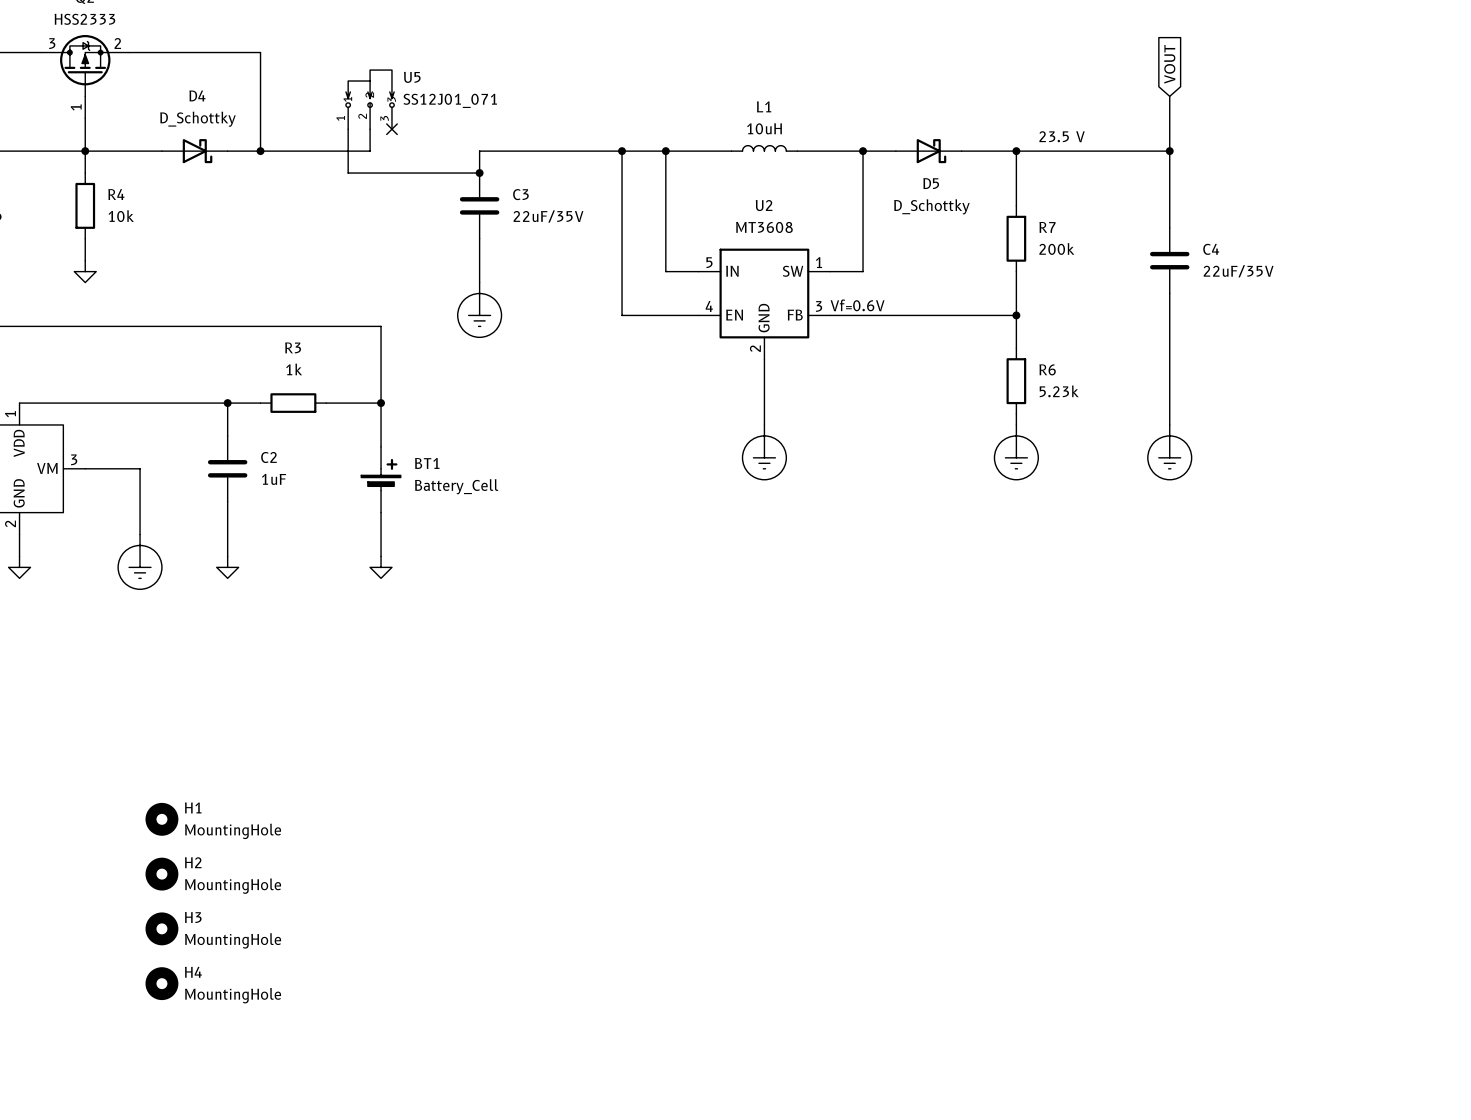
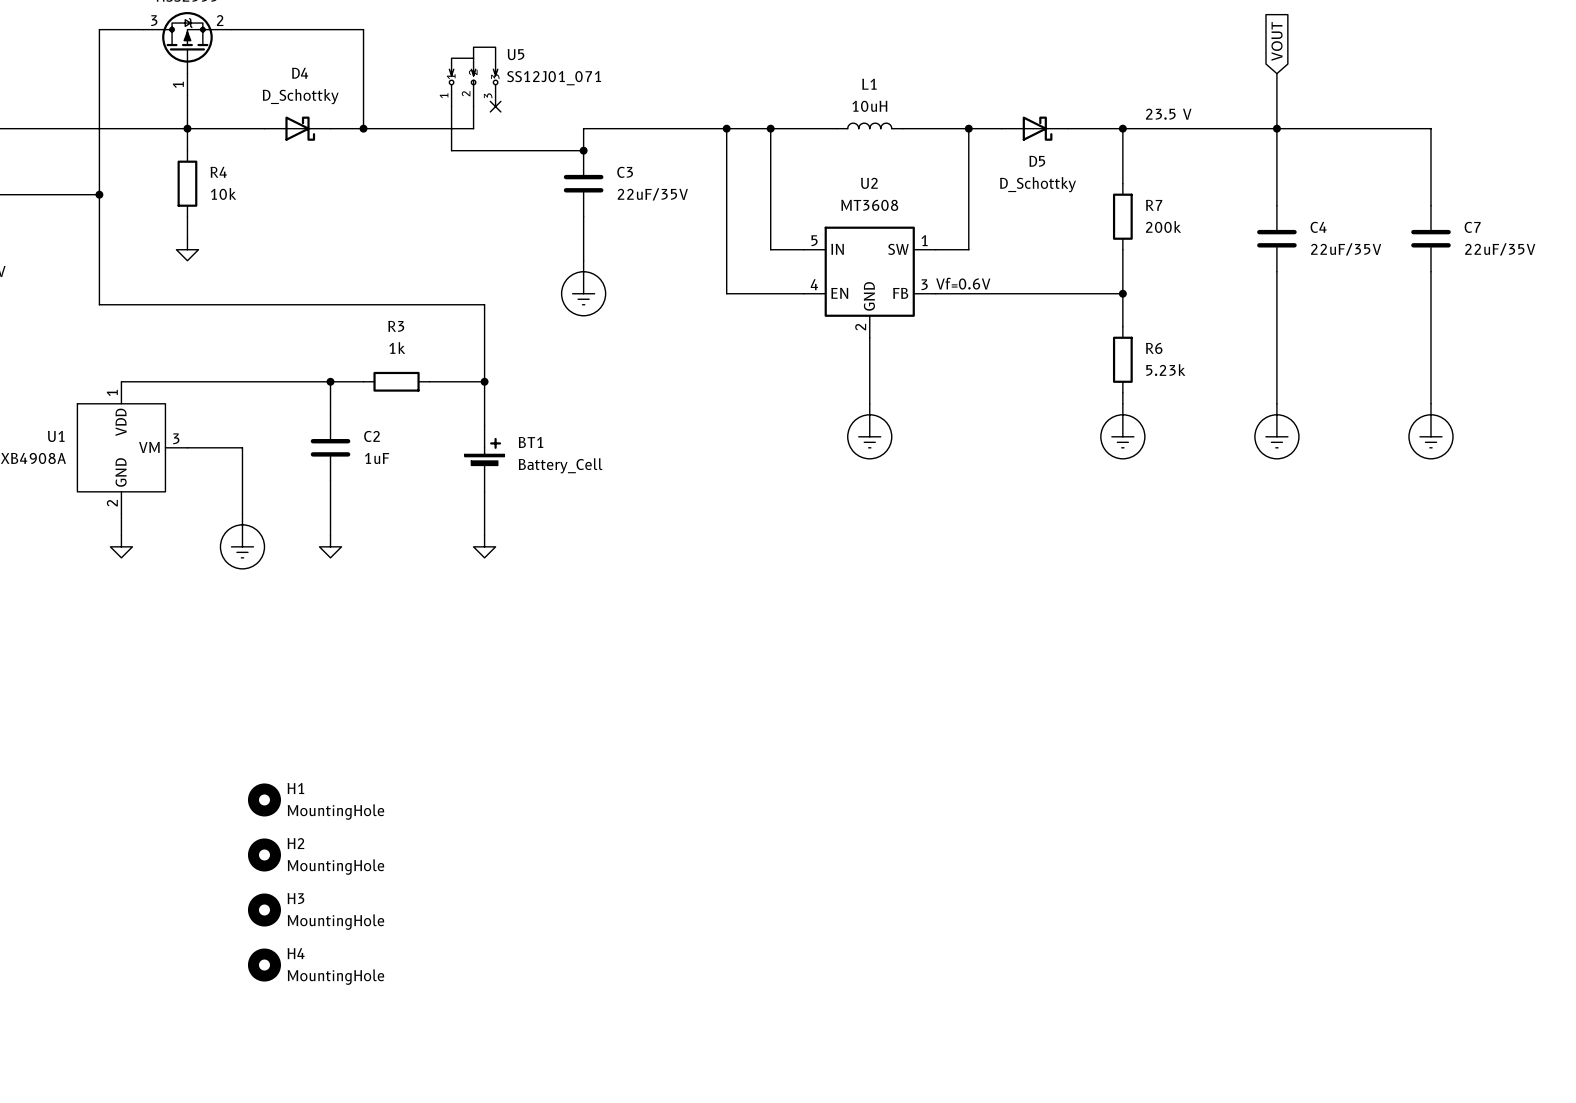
wire: none -> (1276, 128) (1430, 128) (1430, 205)
C7: none -> 22uF/35V (1430, 238)
wire: none -> (1430, 271) (1430, 403)
power symbol: none -> (1430, 431)

